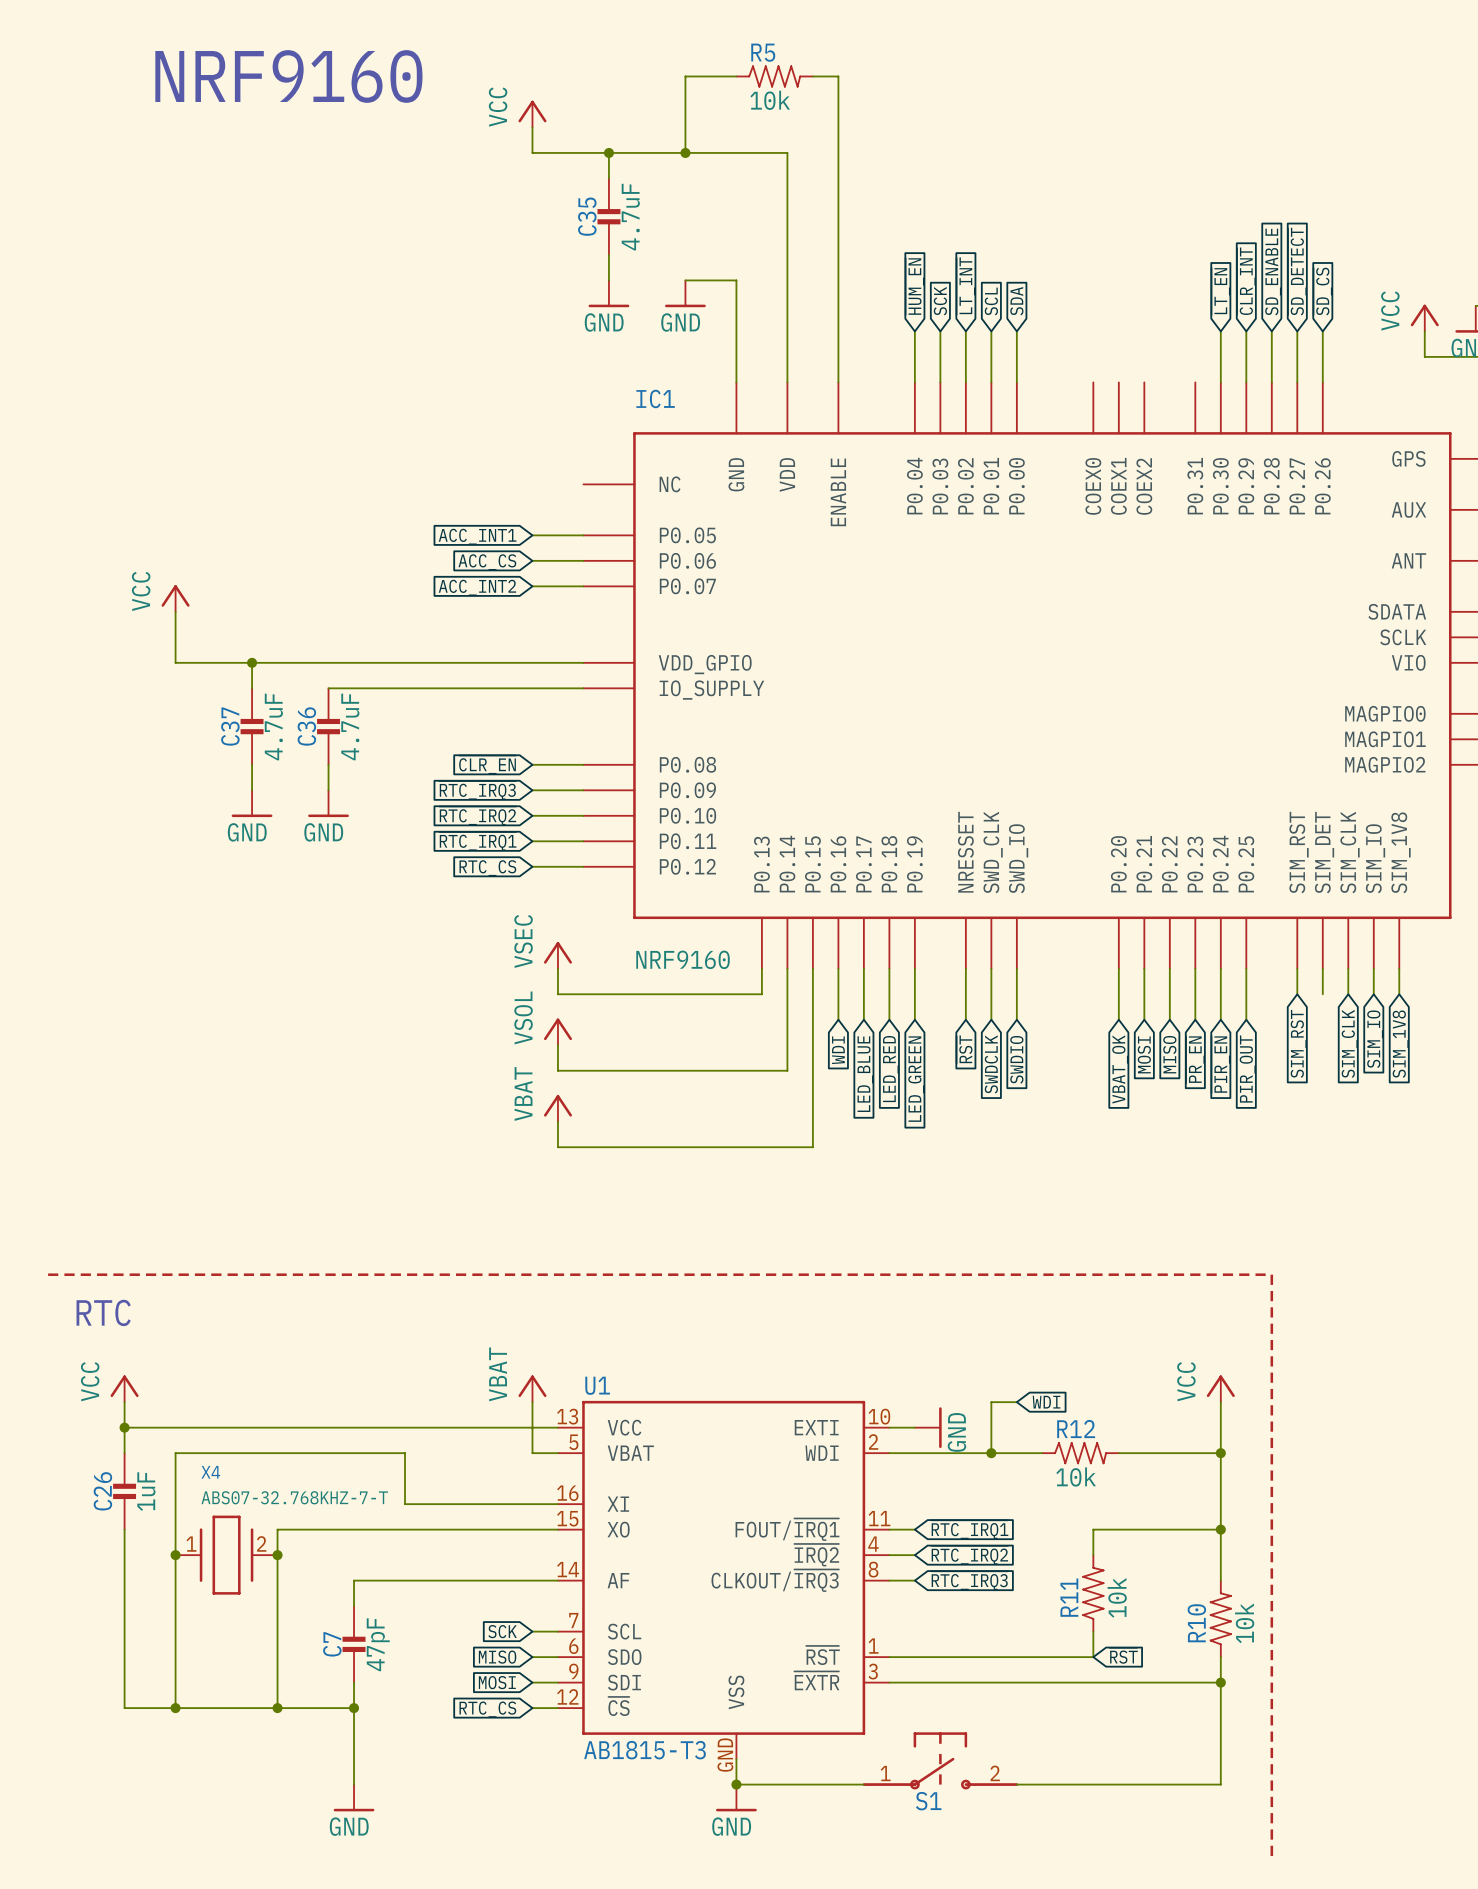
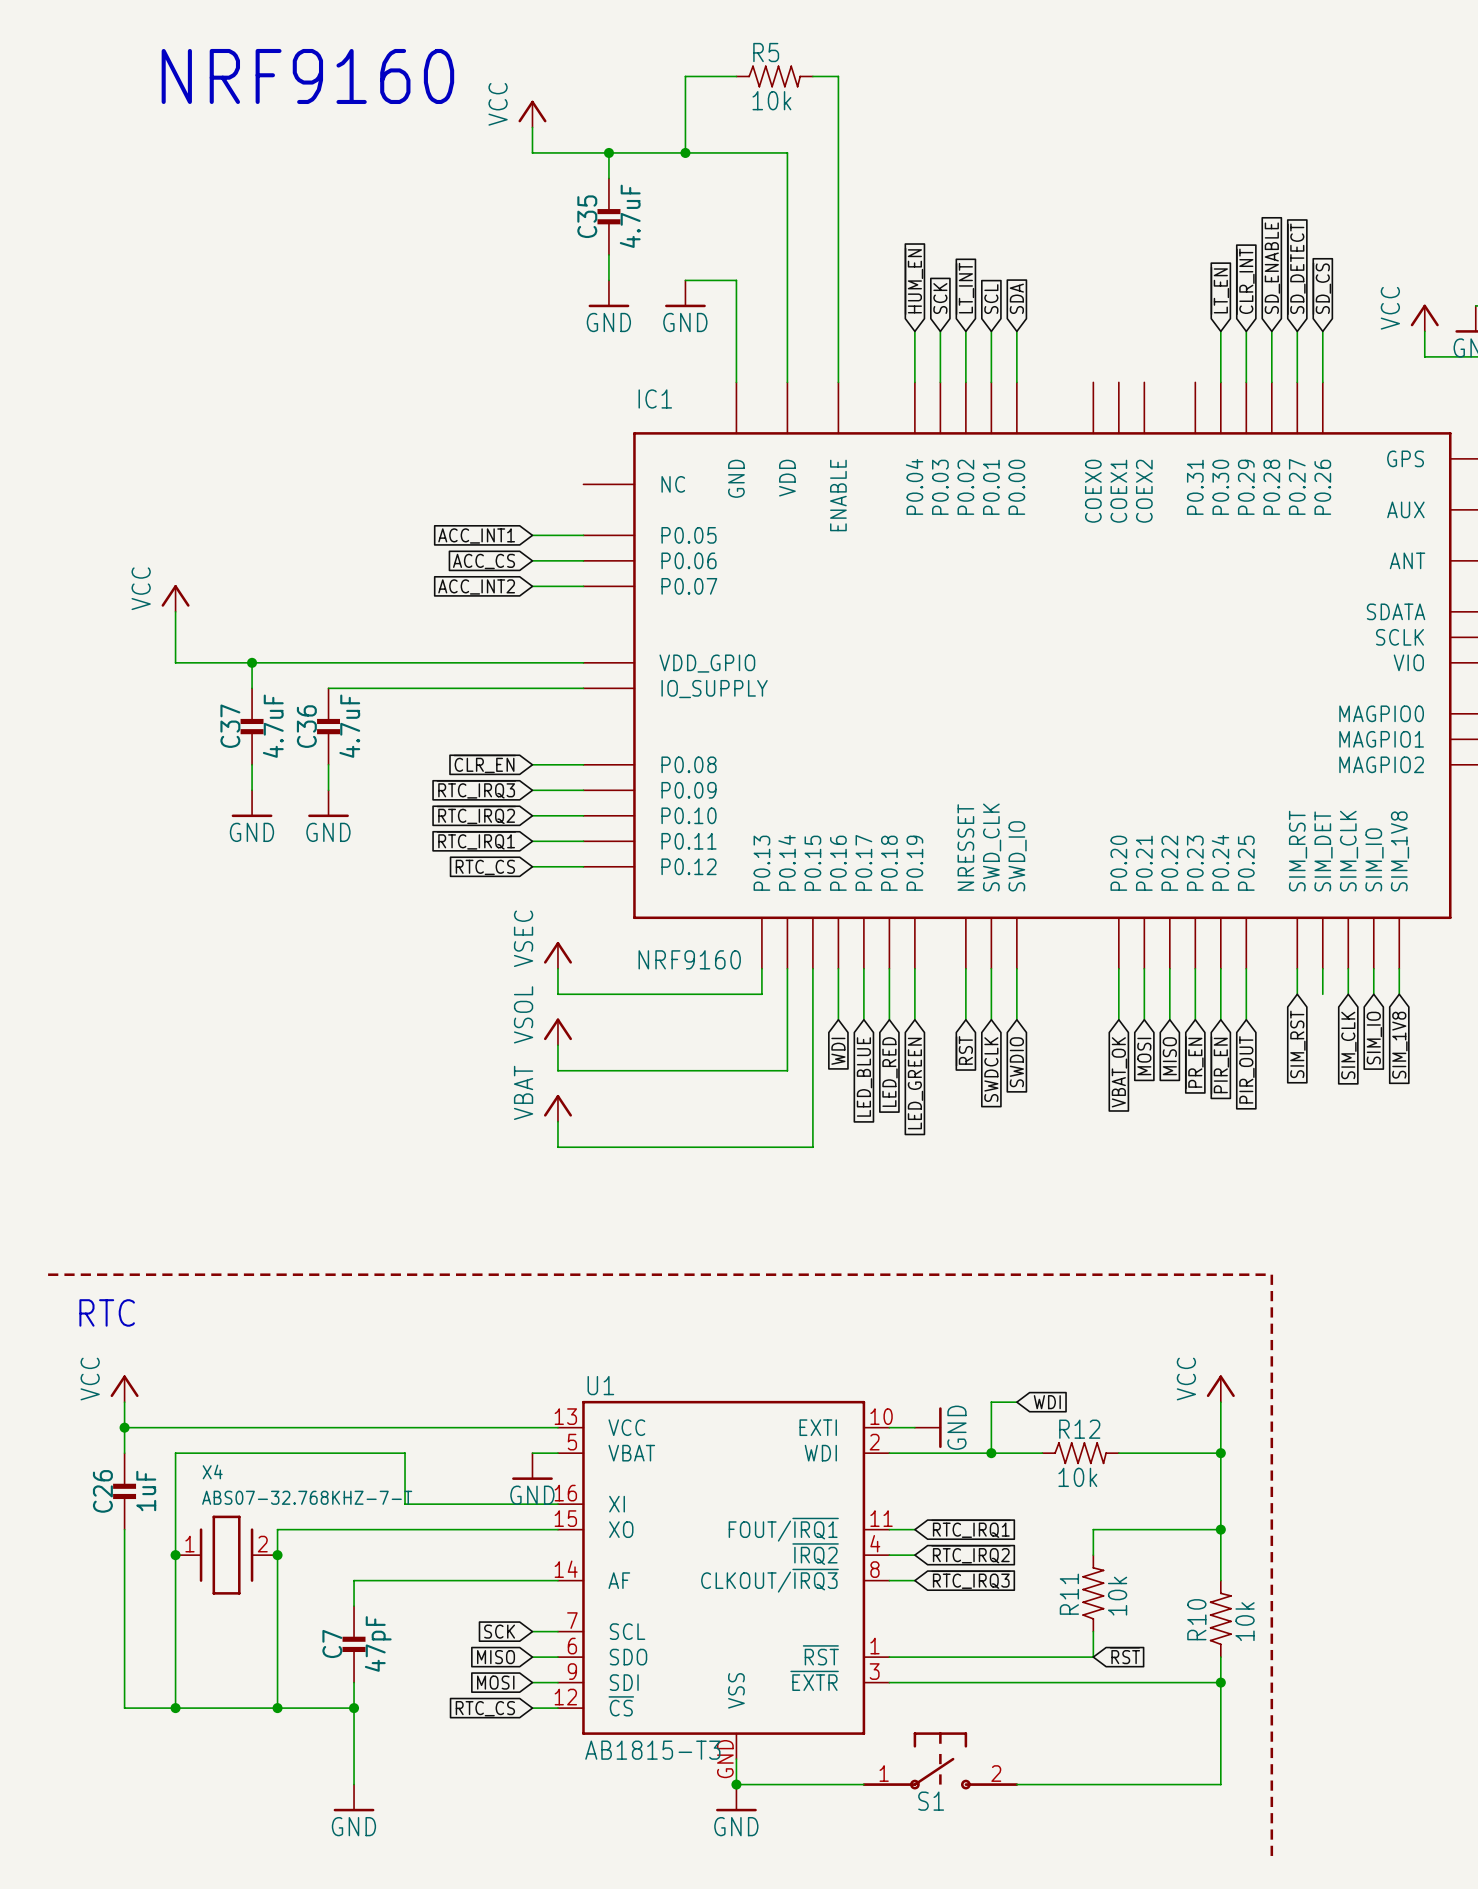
power symbol: VBAT (532, 1388) -> none
wire: (532, 1402) (532, 1453) -> none
power symbol: none -> GND (532, 1466)

